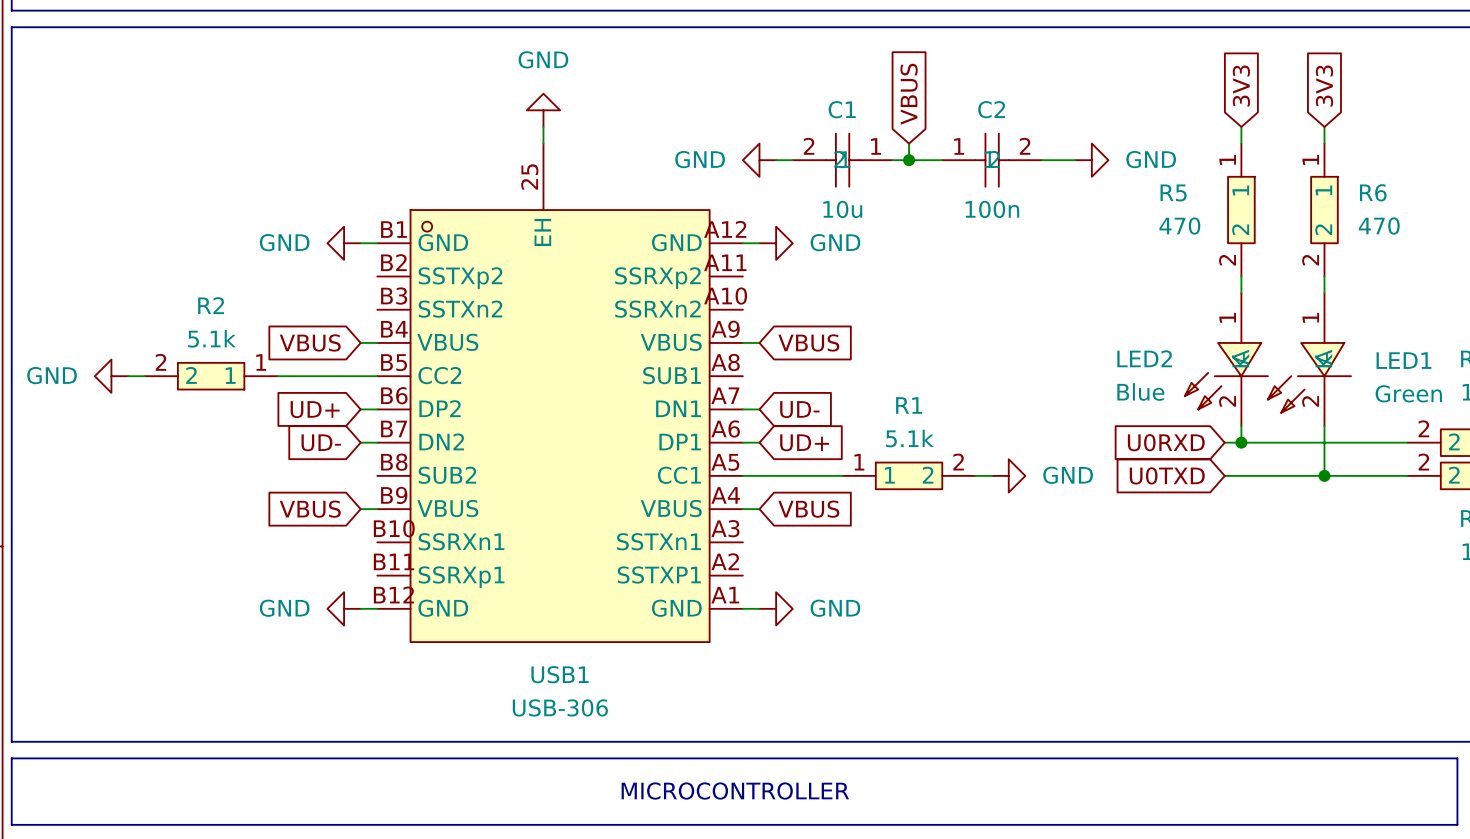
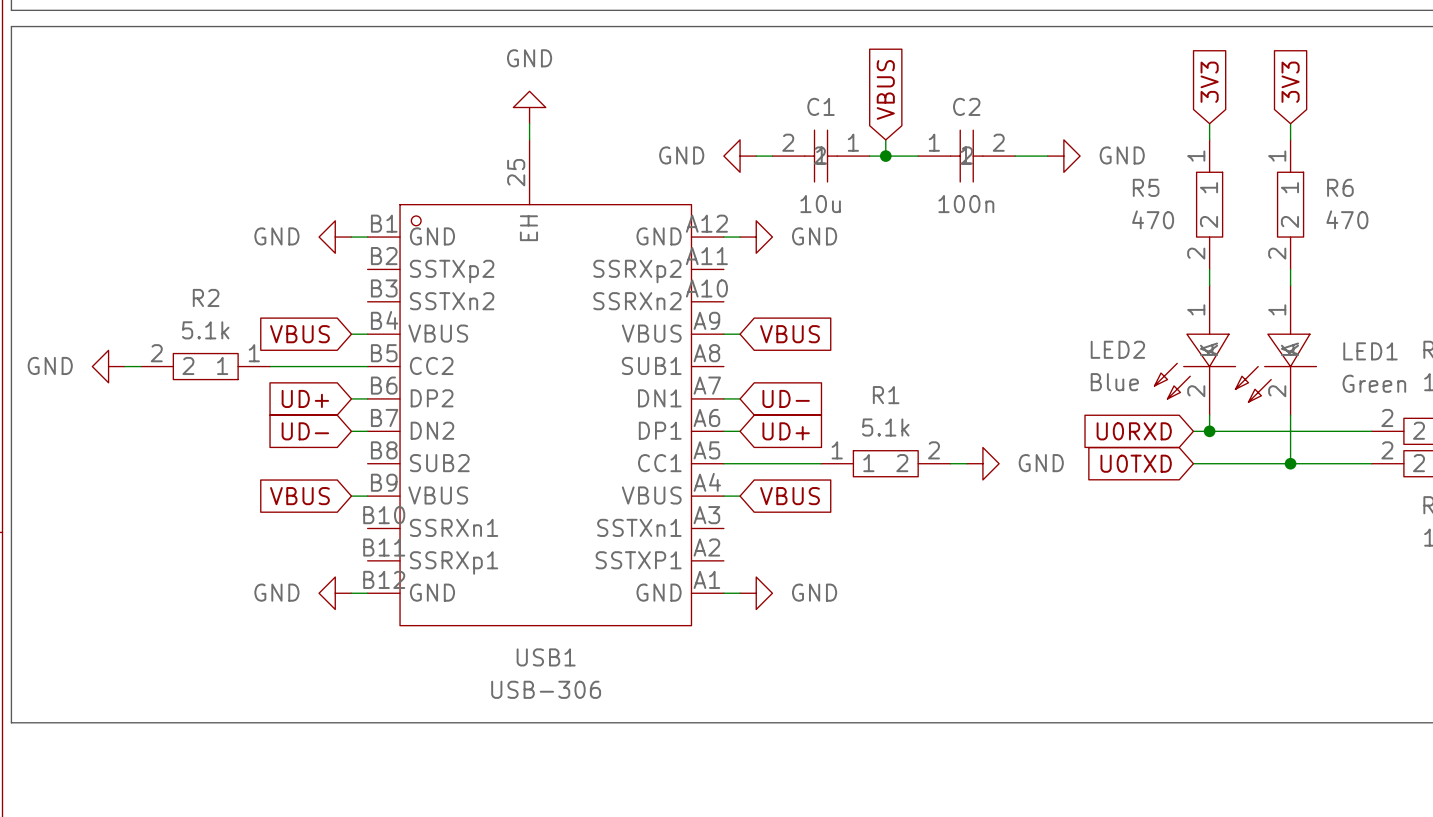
line: (11, 758) (11, 824) (1457, 824) (1457, 758) (11, 758) -> none
text: MICROCONTROLLER (735, 791) -> none

